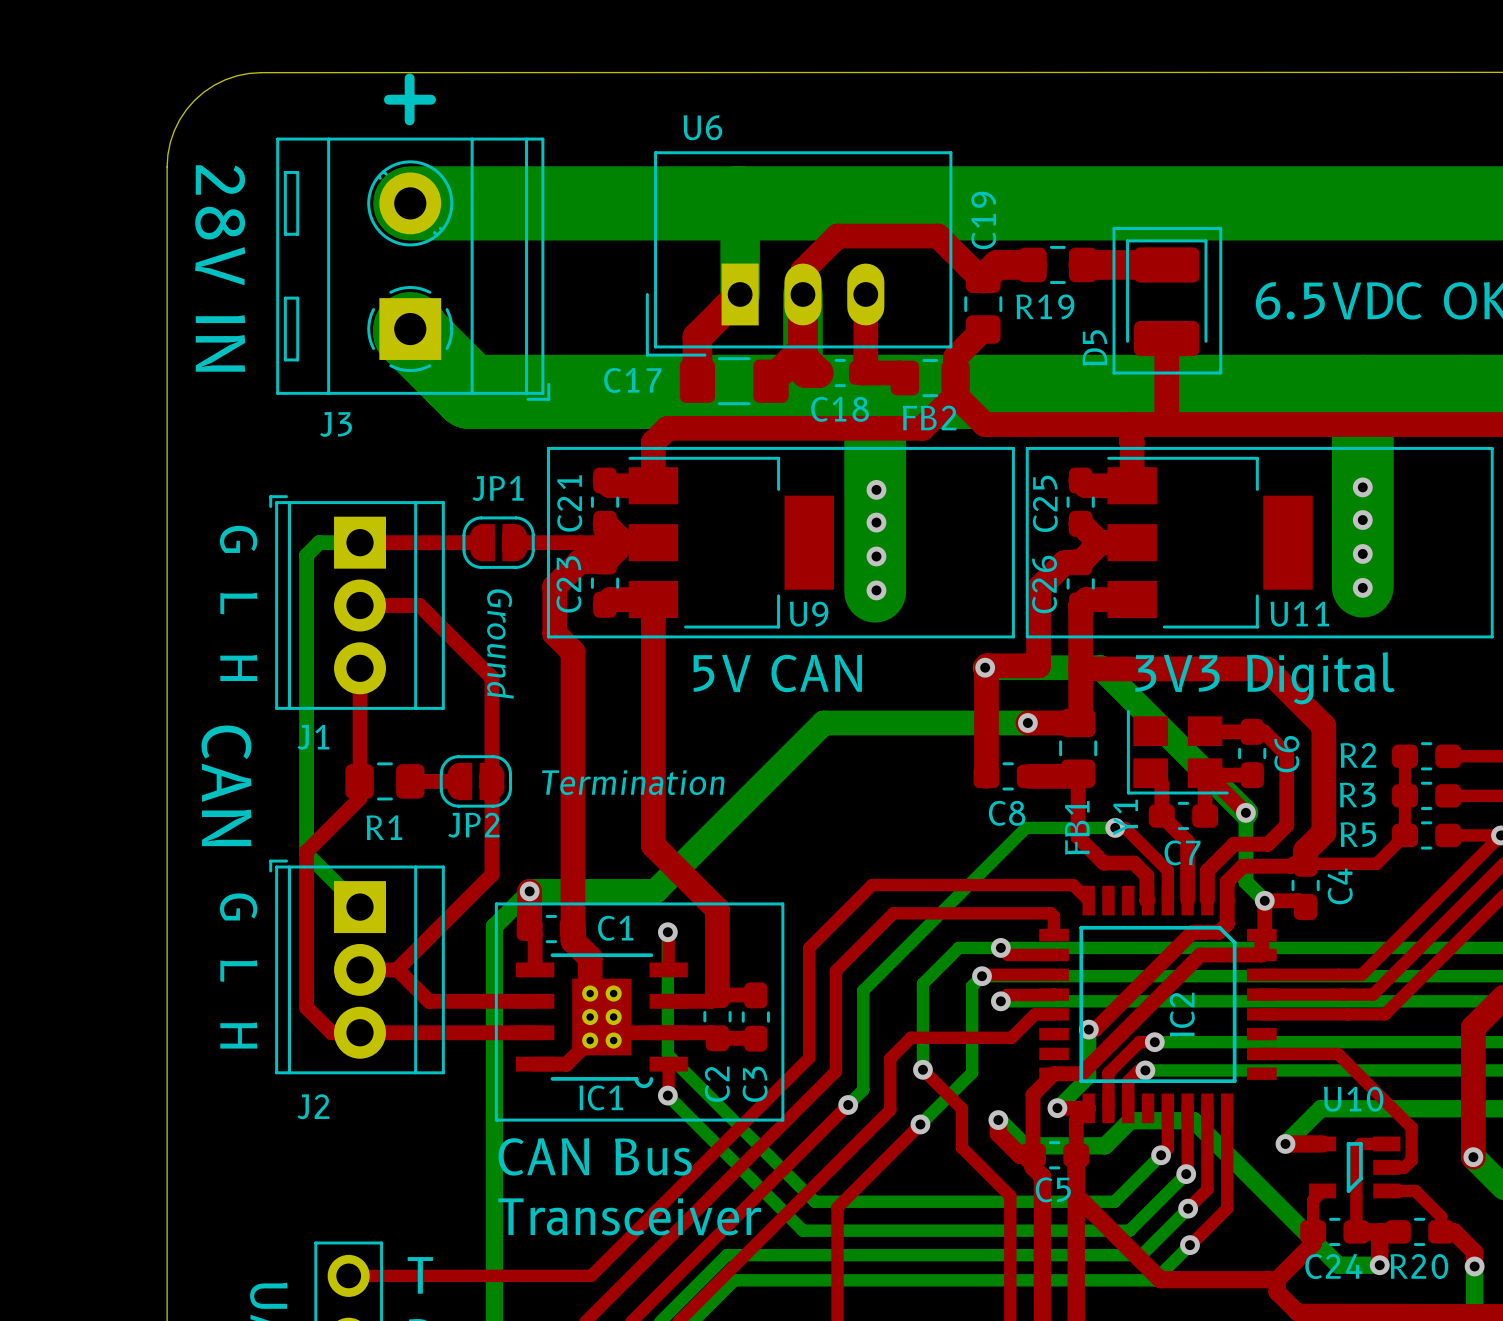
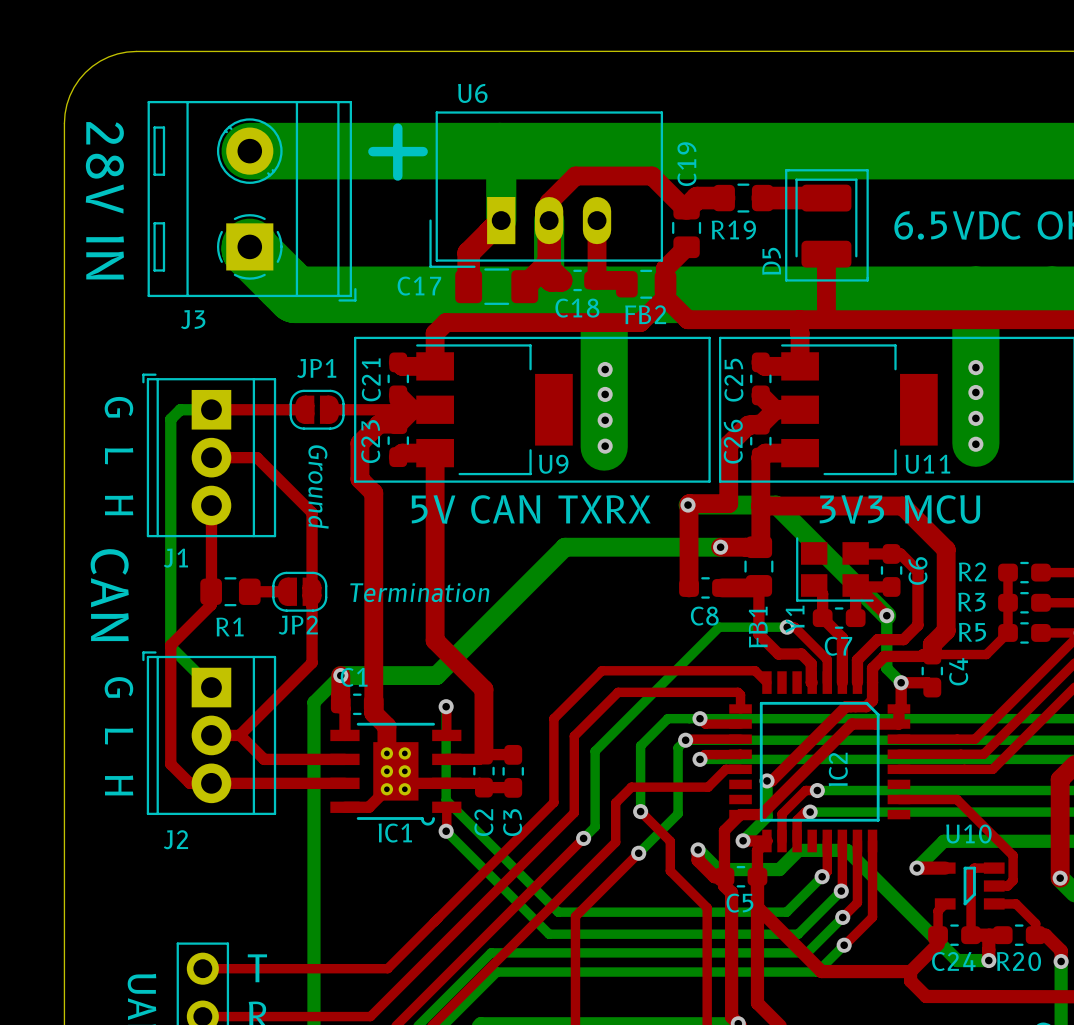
line: (409, 78) (409, 120) -> none
line: (388, 99) (431, 99) -> none
line: none -> (397, 128) (397, 176)
line: none -> (372, 151) (423, 151)
text: 5V CAN (777, 673) -> 5V CAN TXRX (531, 509)
text: 3V3 Digital (1264, 678) -> 3V3 MCU (899, 509)
line: (496, 903) (782, 903) (782, 1120) (496, 1120) (496, 903) -> none
C1 name position: C1 (615, 928) -> C1 (354, 677)
text: CAN Bus (595, 1156) -> none
text: Transceiver (629, 1216) -> none

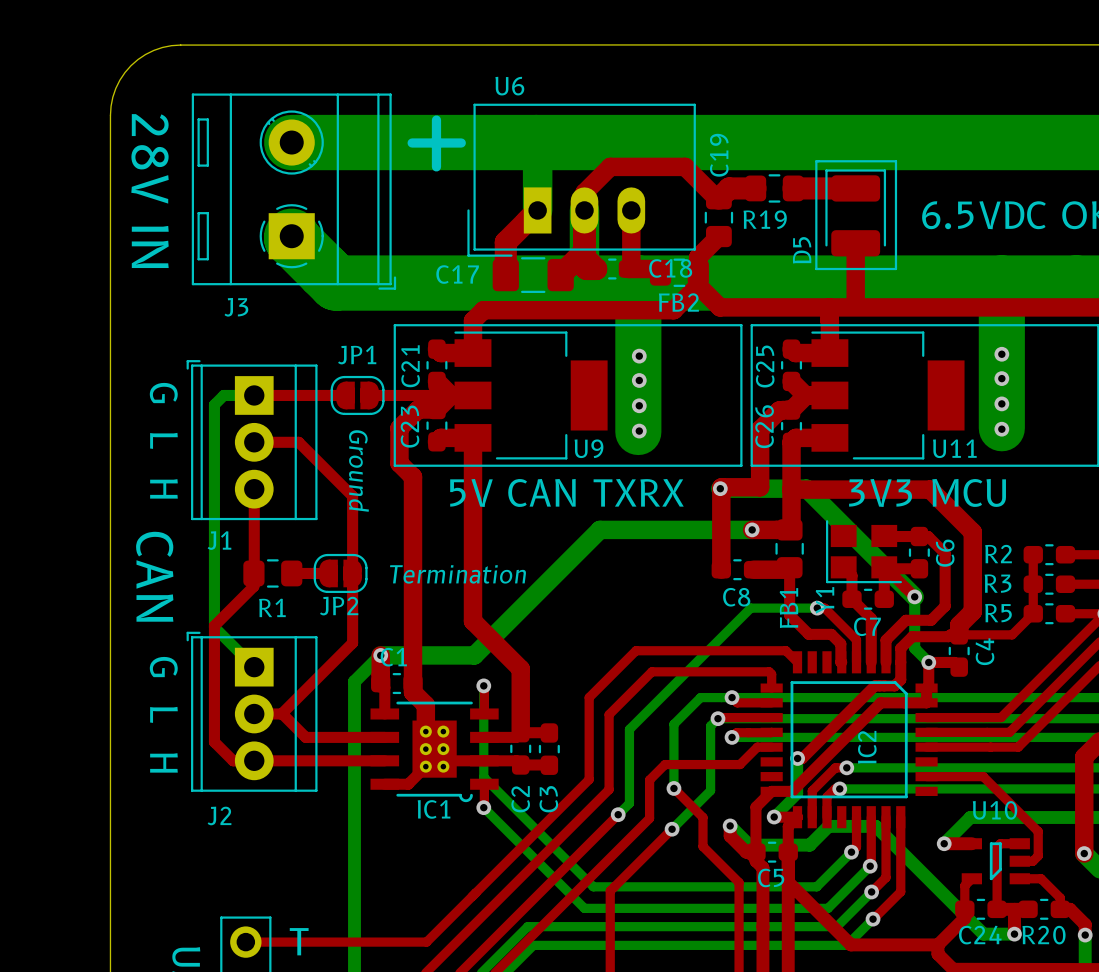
C18 name position: C18 (577, 308) -> C18 (670, 268)

